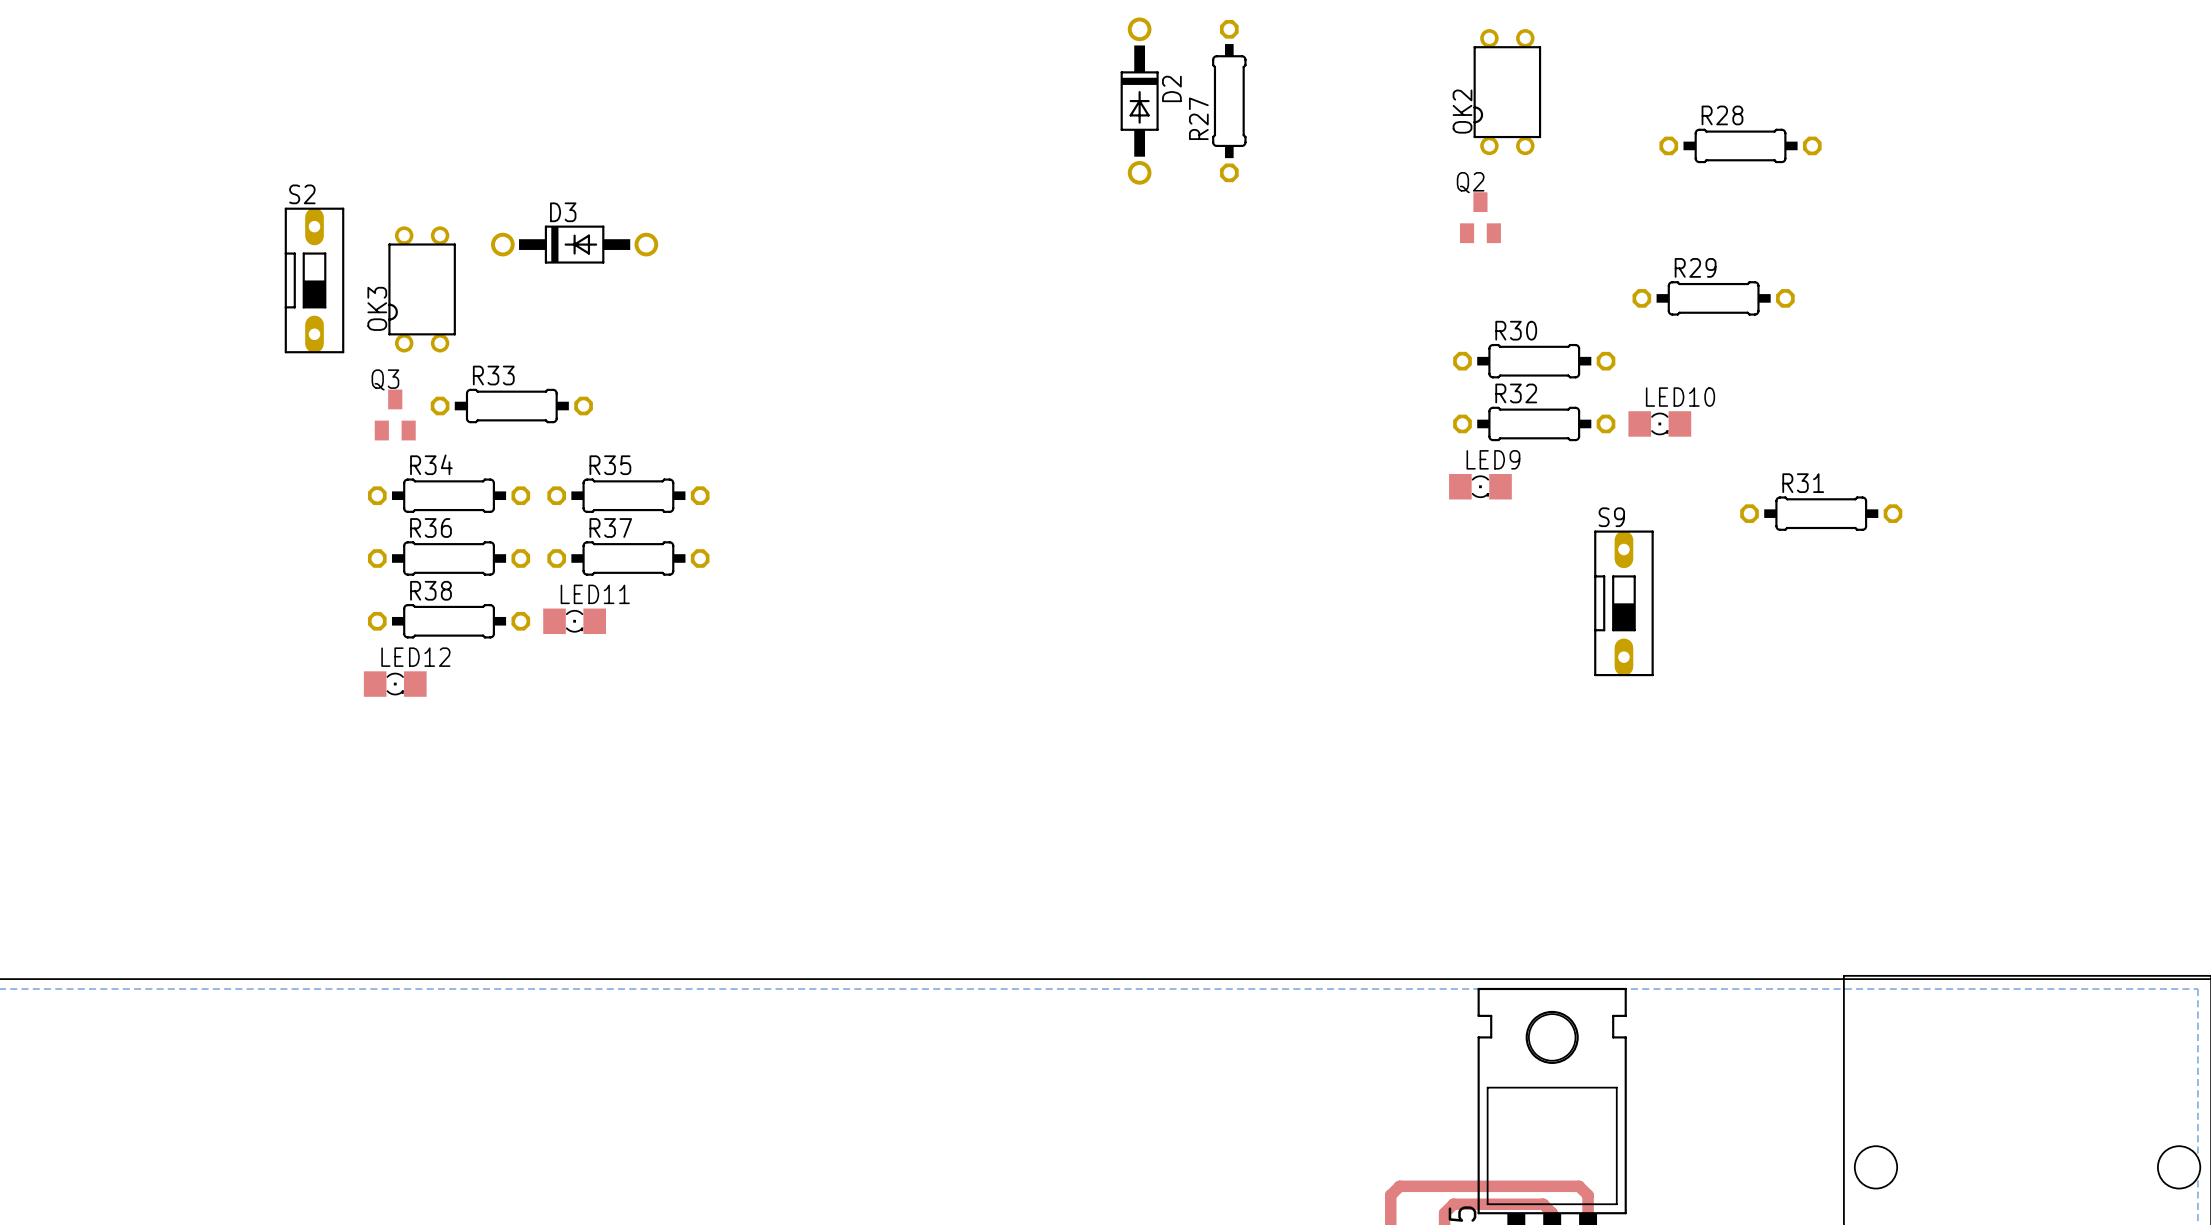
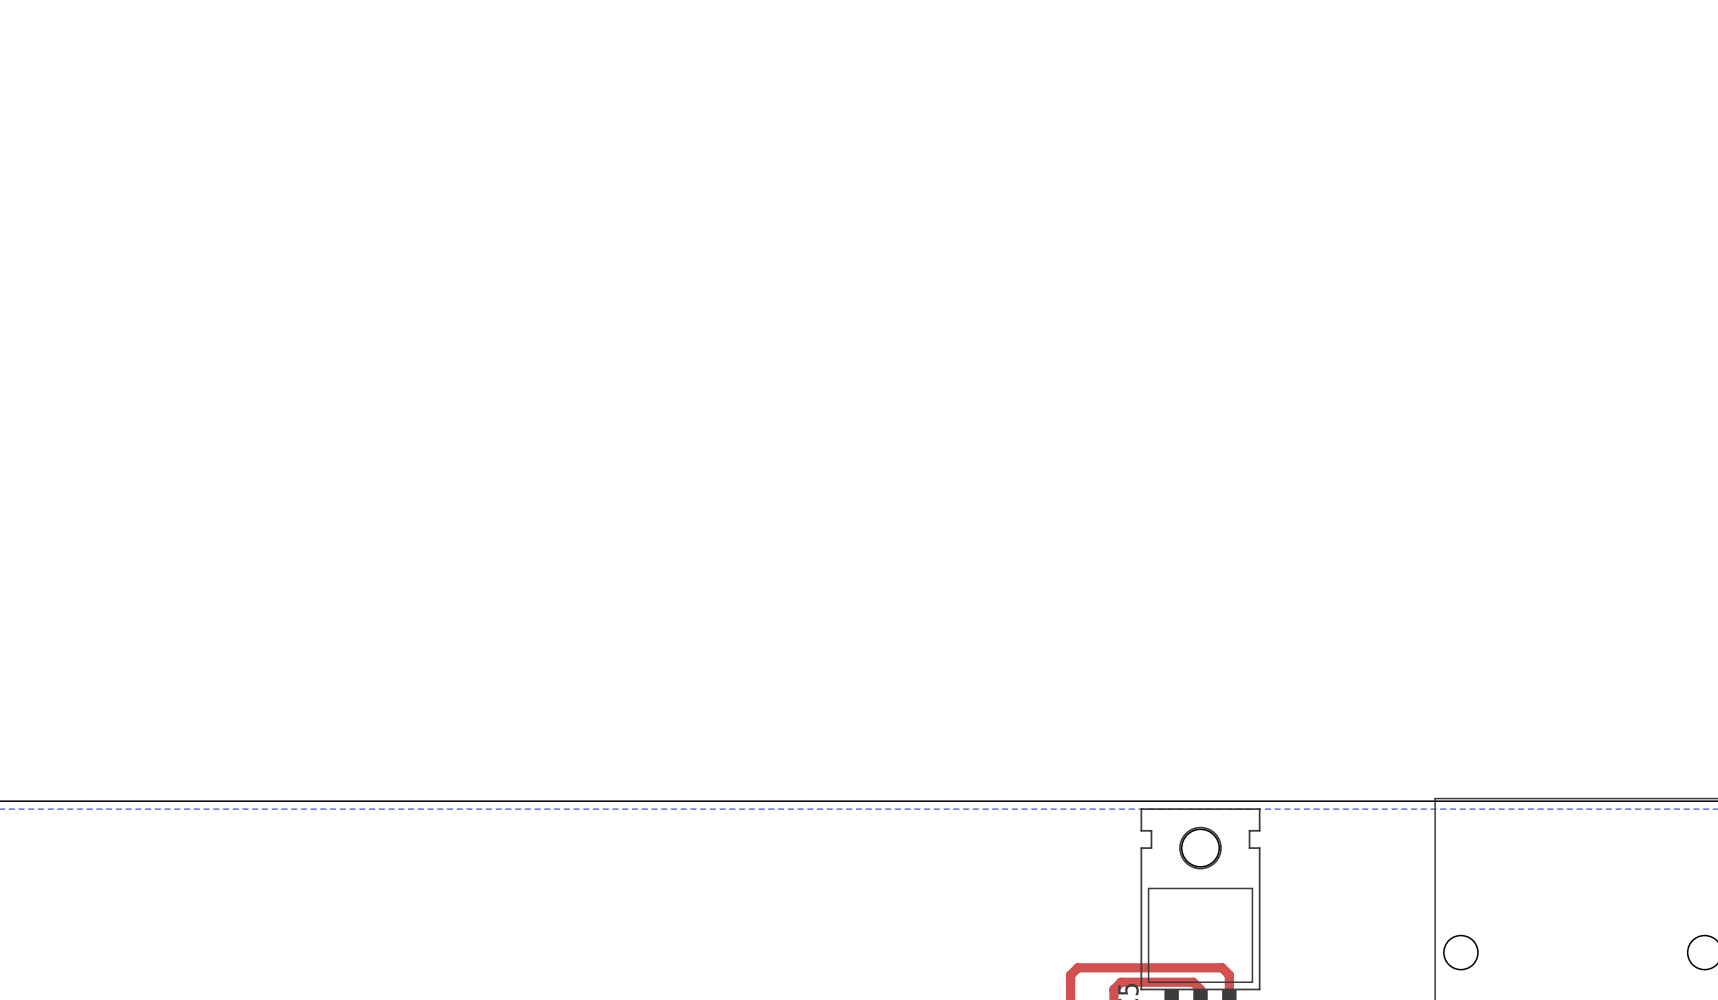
OK2: (1507, 92) -> none
D2: (1139, 101) -> none
R27: (1229, 101) -> none
R28: (1740, 145) -> none
Q2: (1480, 217) -> none
D3: (574, 244) -> none
S2: (314, 280) -> none
OK3: (422, 289) -> none
R29: (1713, 298) -> none
R30: (1534, 361) -> none
R33: (511, 406) -> none
Q3: (395, 414) -> none
R32: (1534, 423) -> none
LED10: (1659, 423) -> none
LED9: (1480, 486) -> none
R34: (449, 495) -> none
R35: (628, 495) -> none
R31: (1821, 513) -> none
R36: (449, 558) -> none
R37: (628, 558) -> none
S9: (1623, 603) -> none
R38: (449, 621) -> none
LED11: (574, 621) -> none
LED12: (395, 684) -> none

